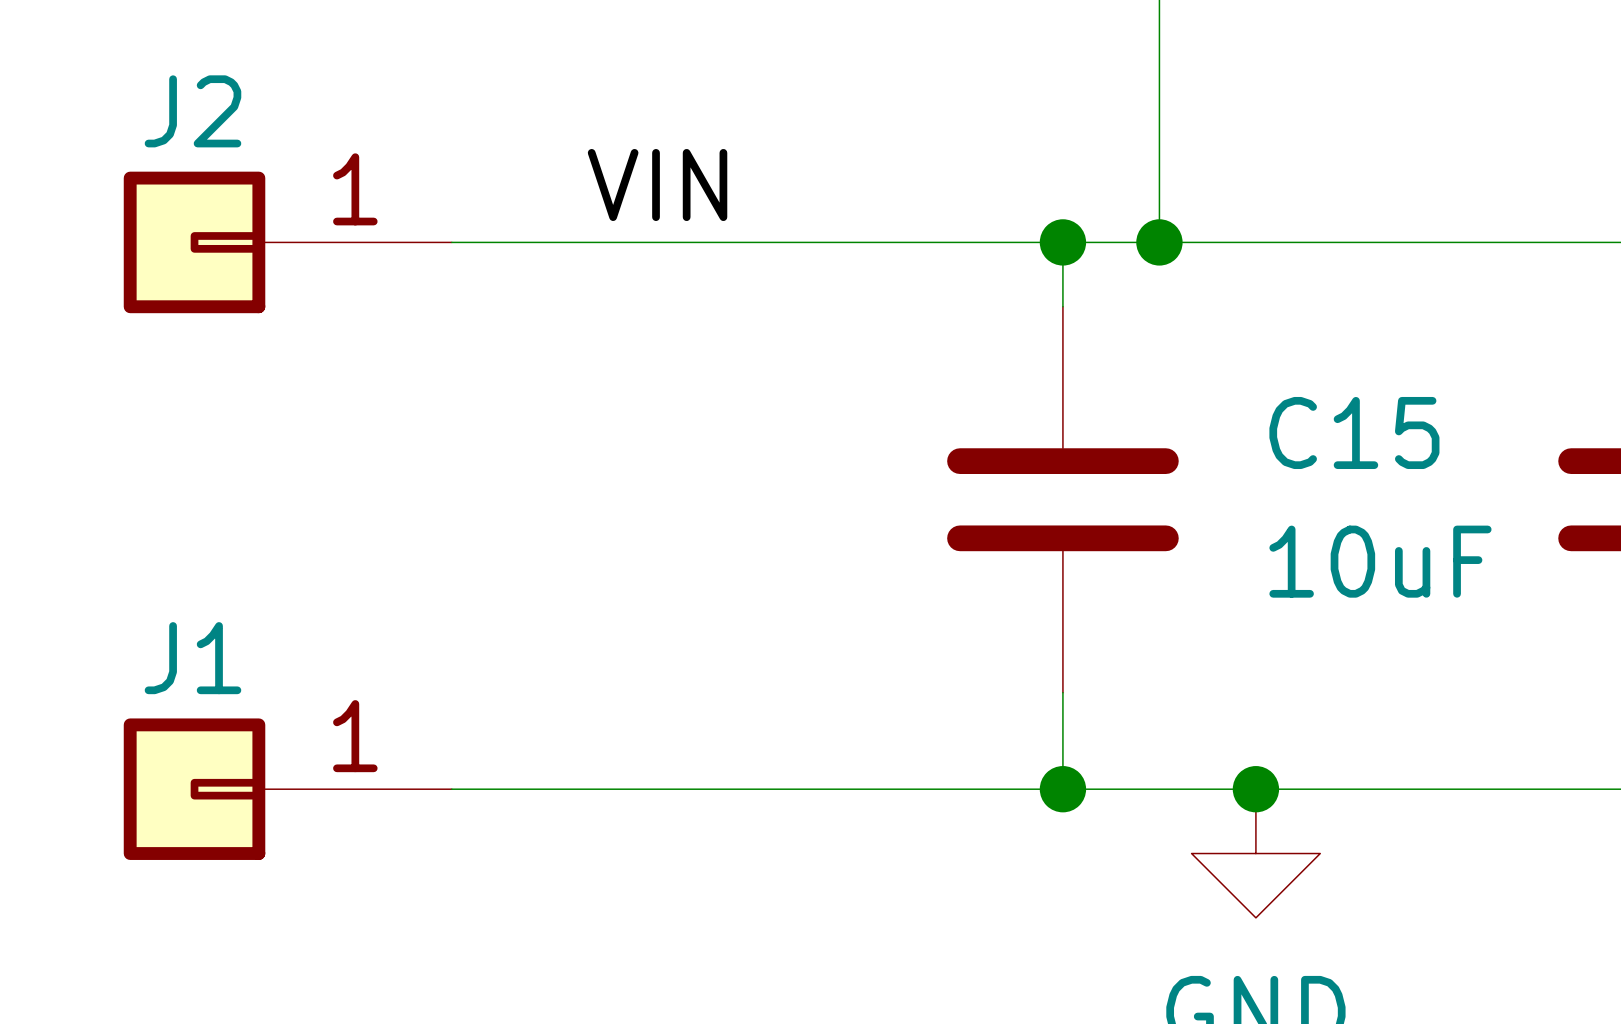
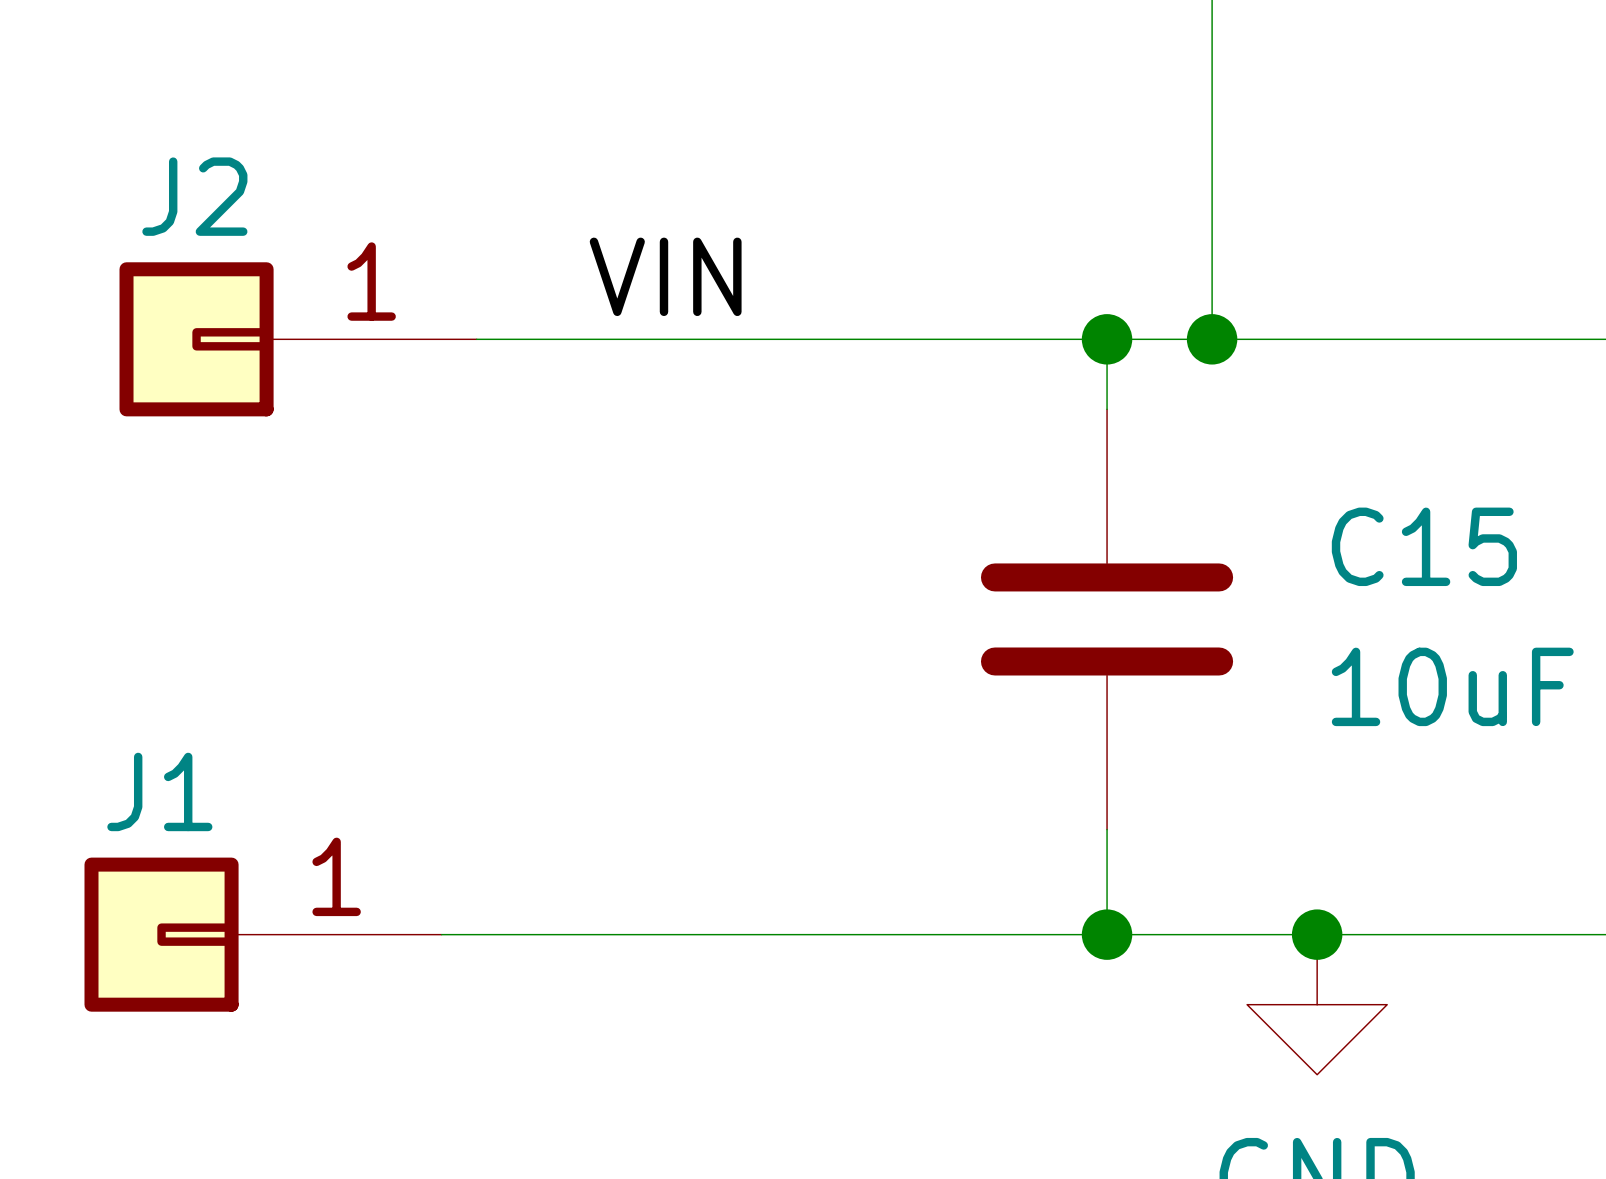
J2 position: (287, 242) -> (298, 339)

